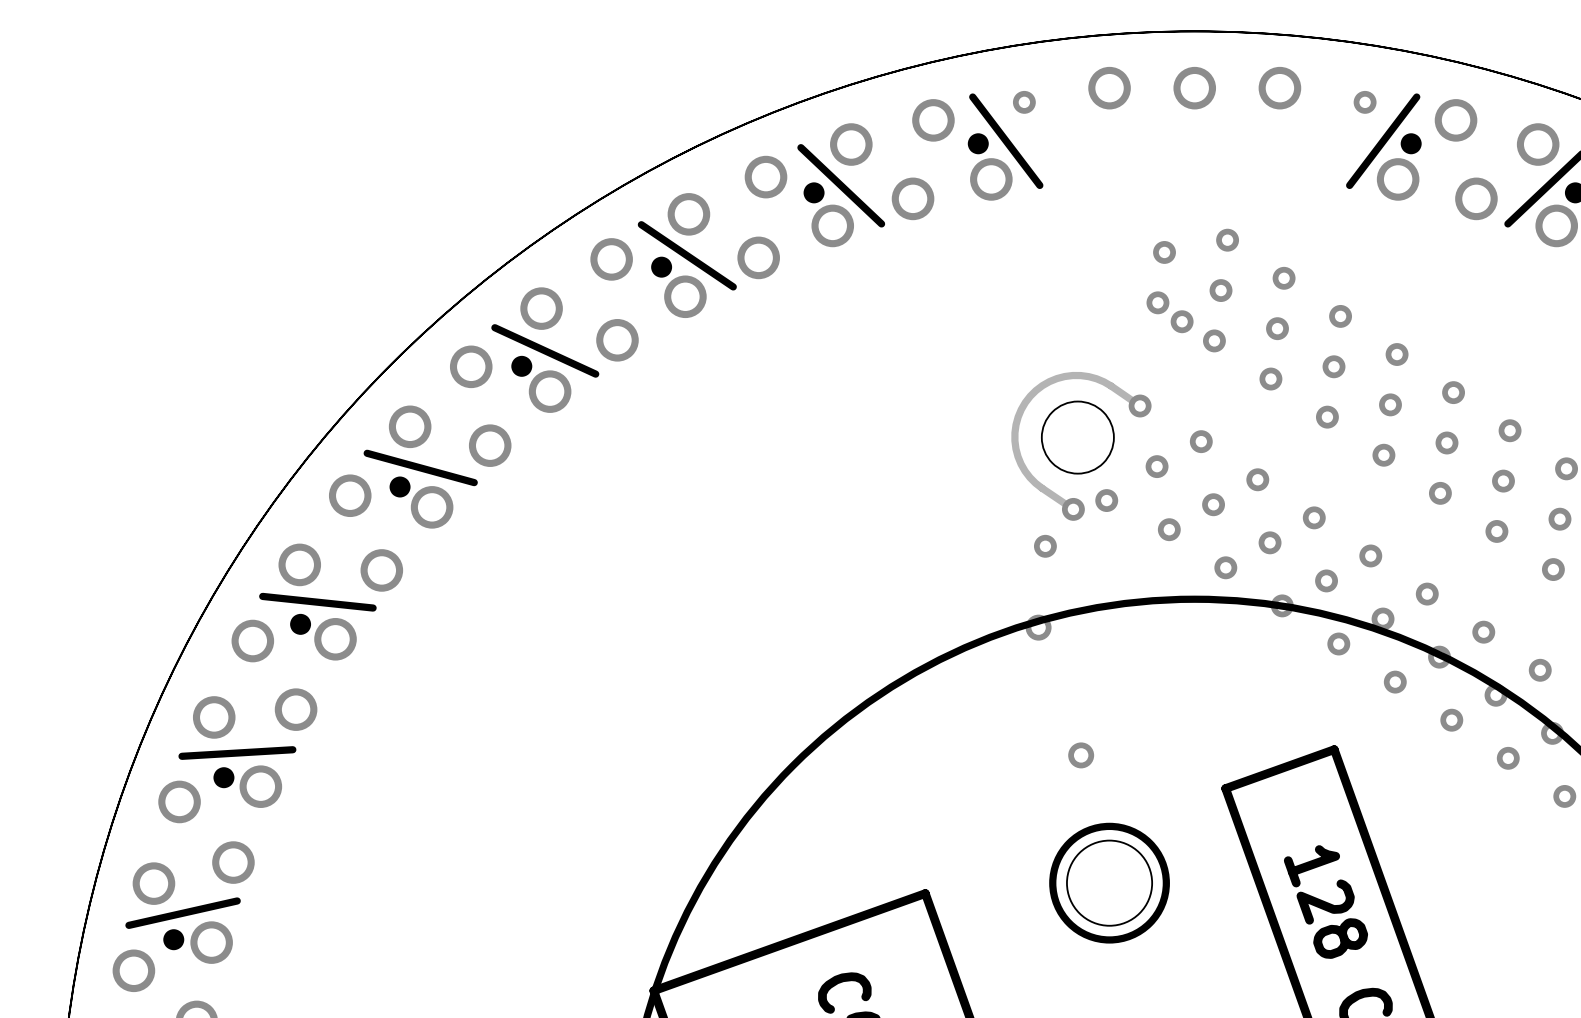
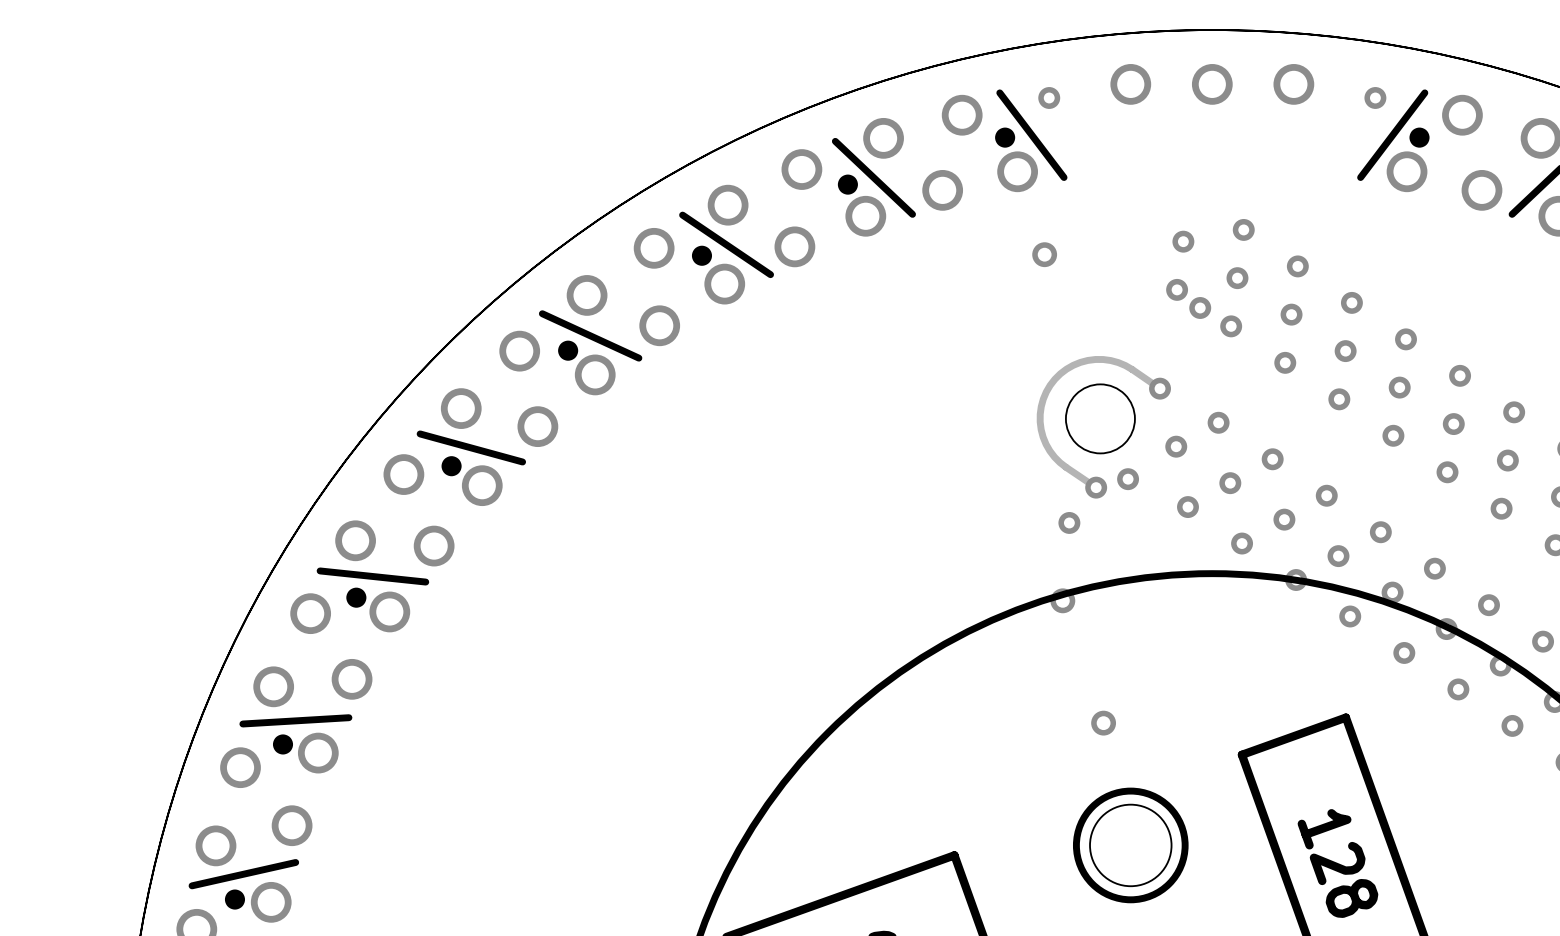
via: none -> (1044, 254)

